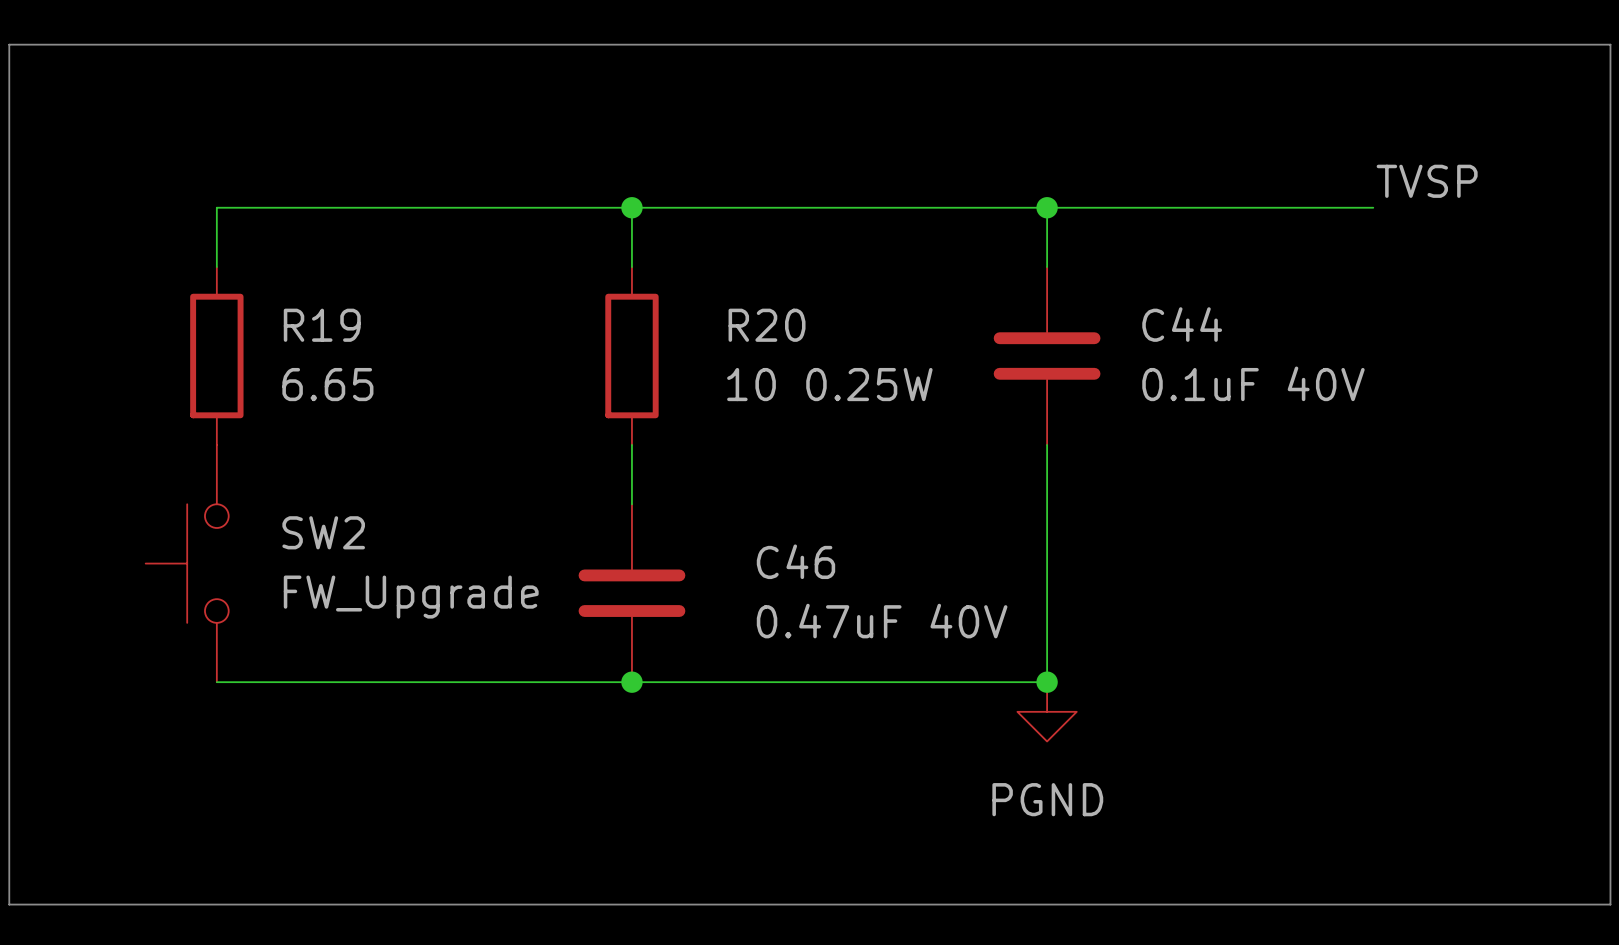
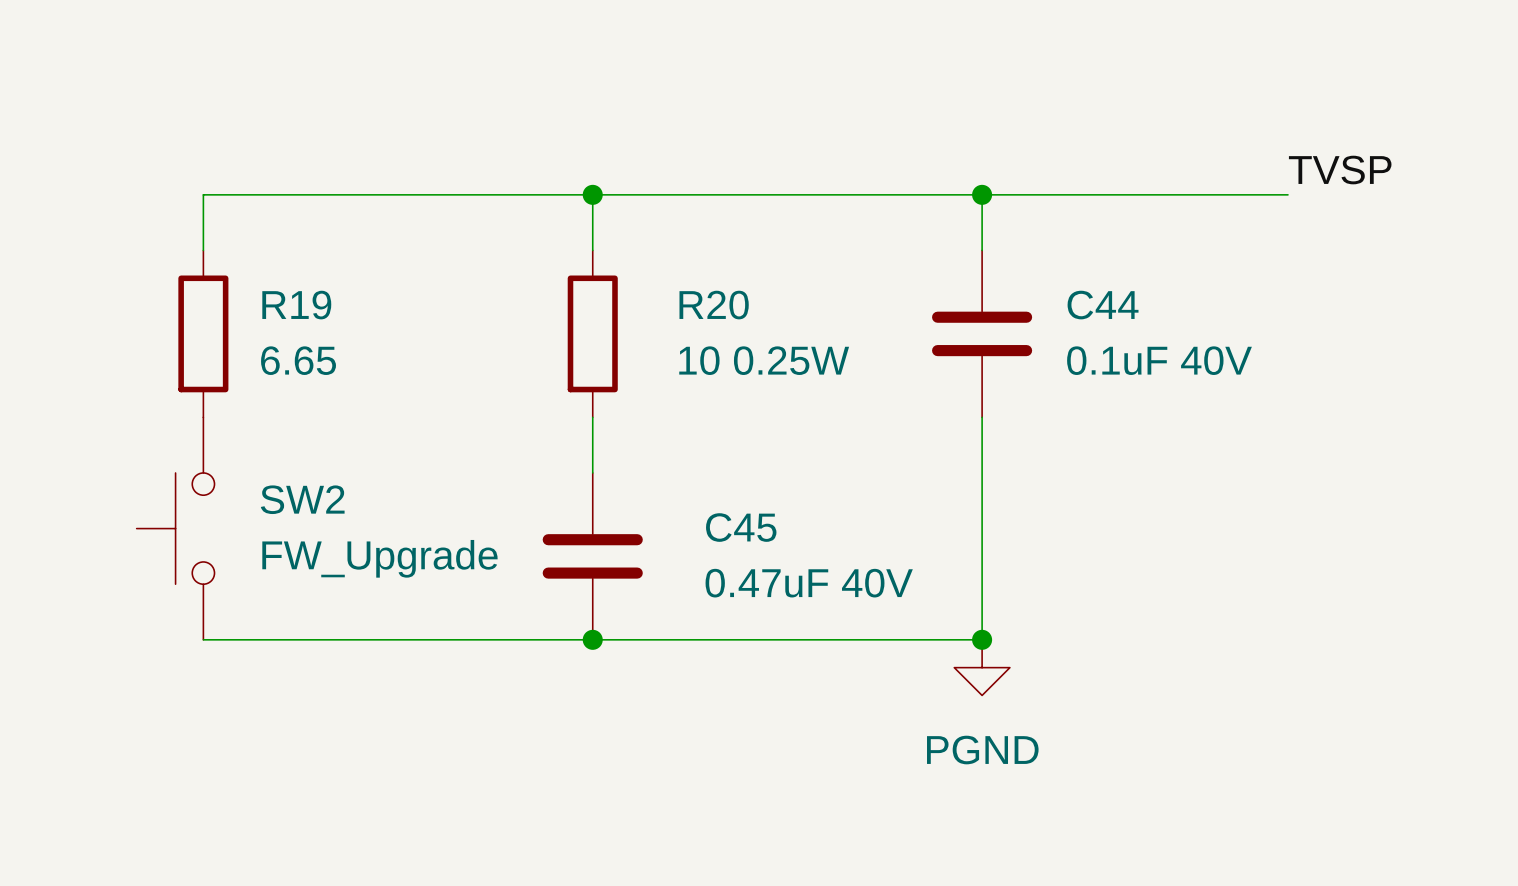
line: (9, 44) (1610, 44) (1610, 904) (9, 904) (9, 44) -> none
C46 name: C46 (795, 561) -> C45 (741, 527)

